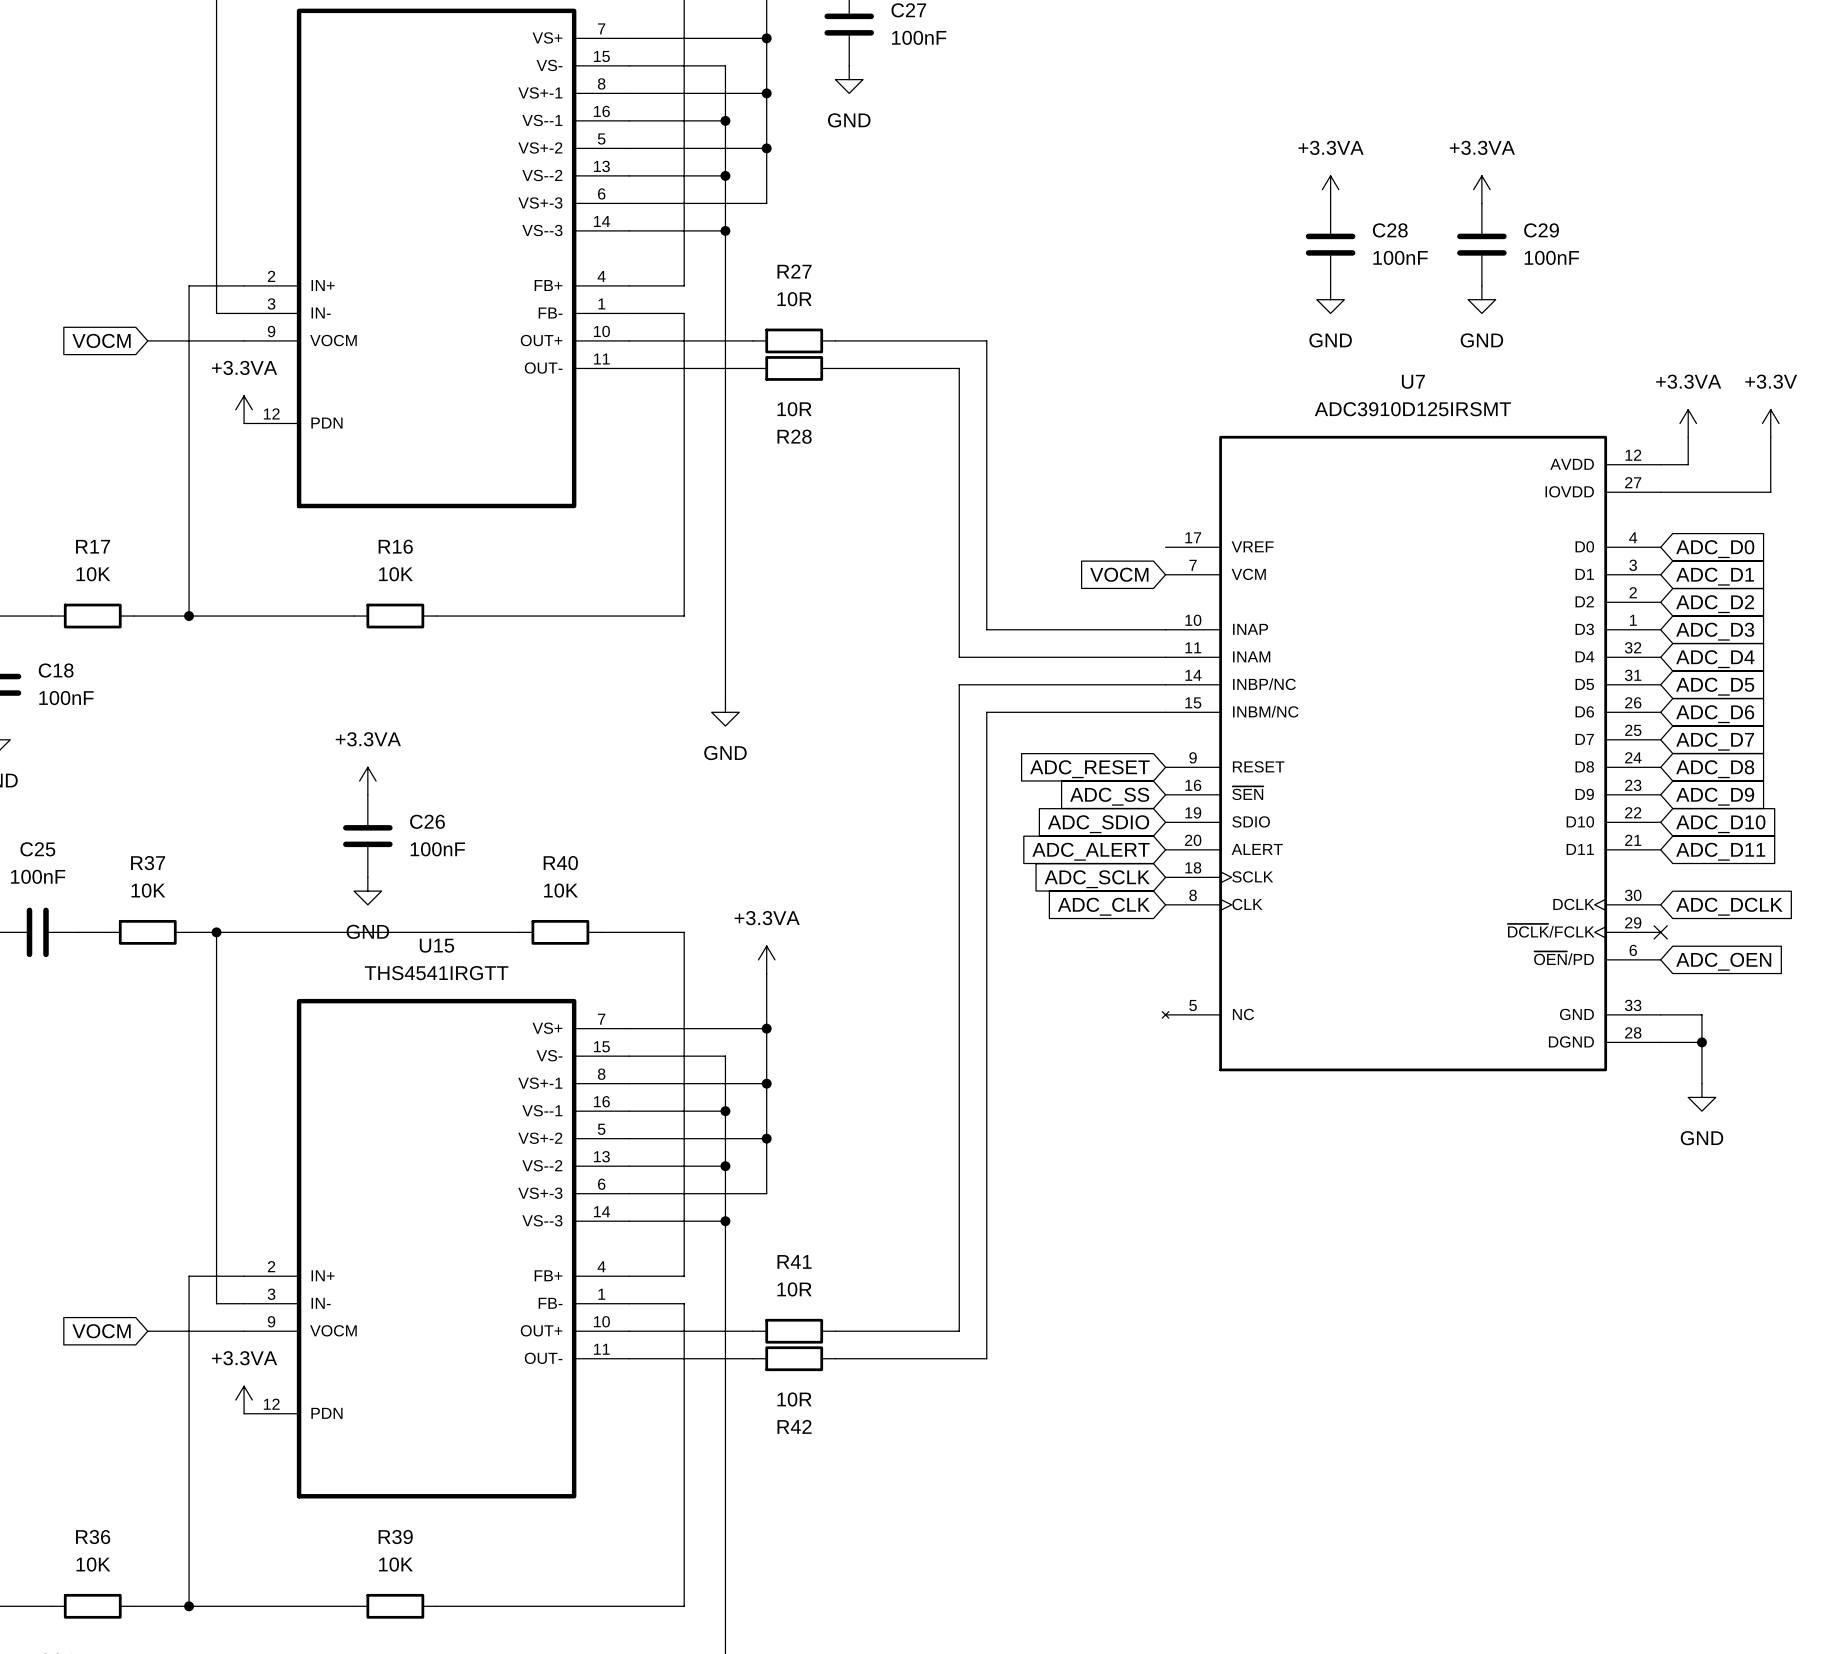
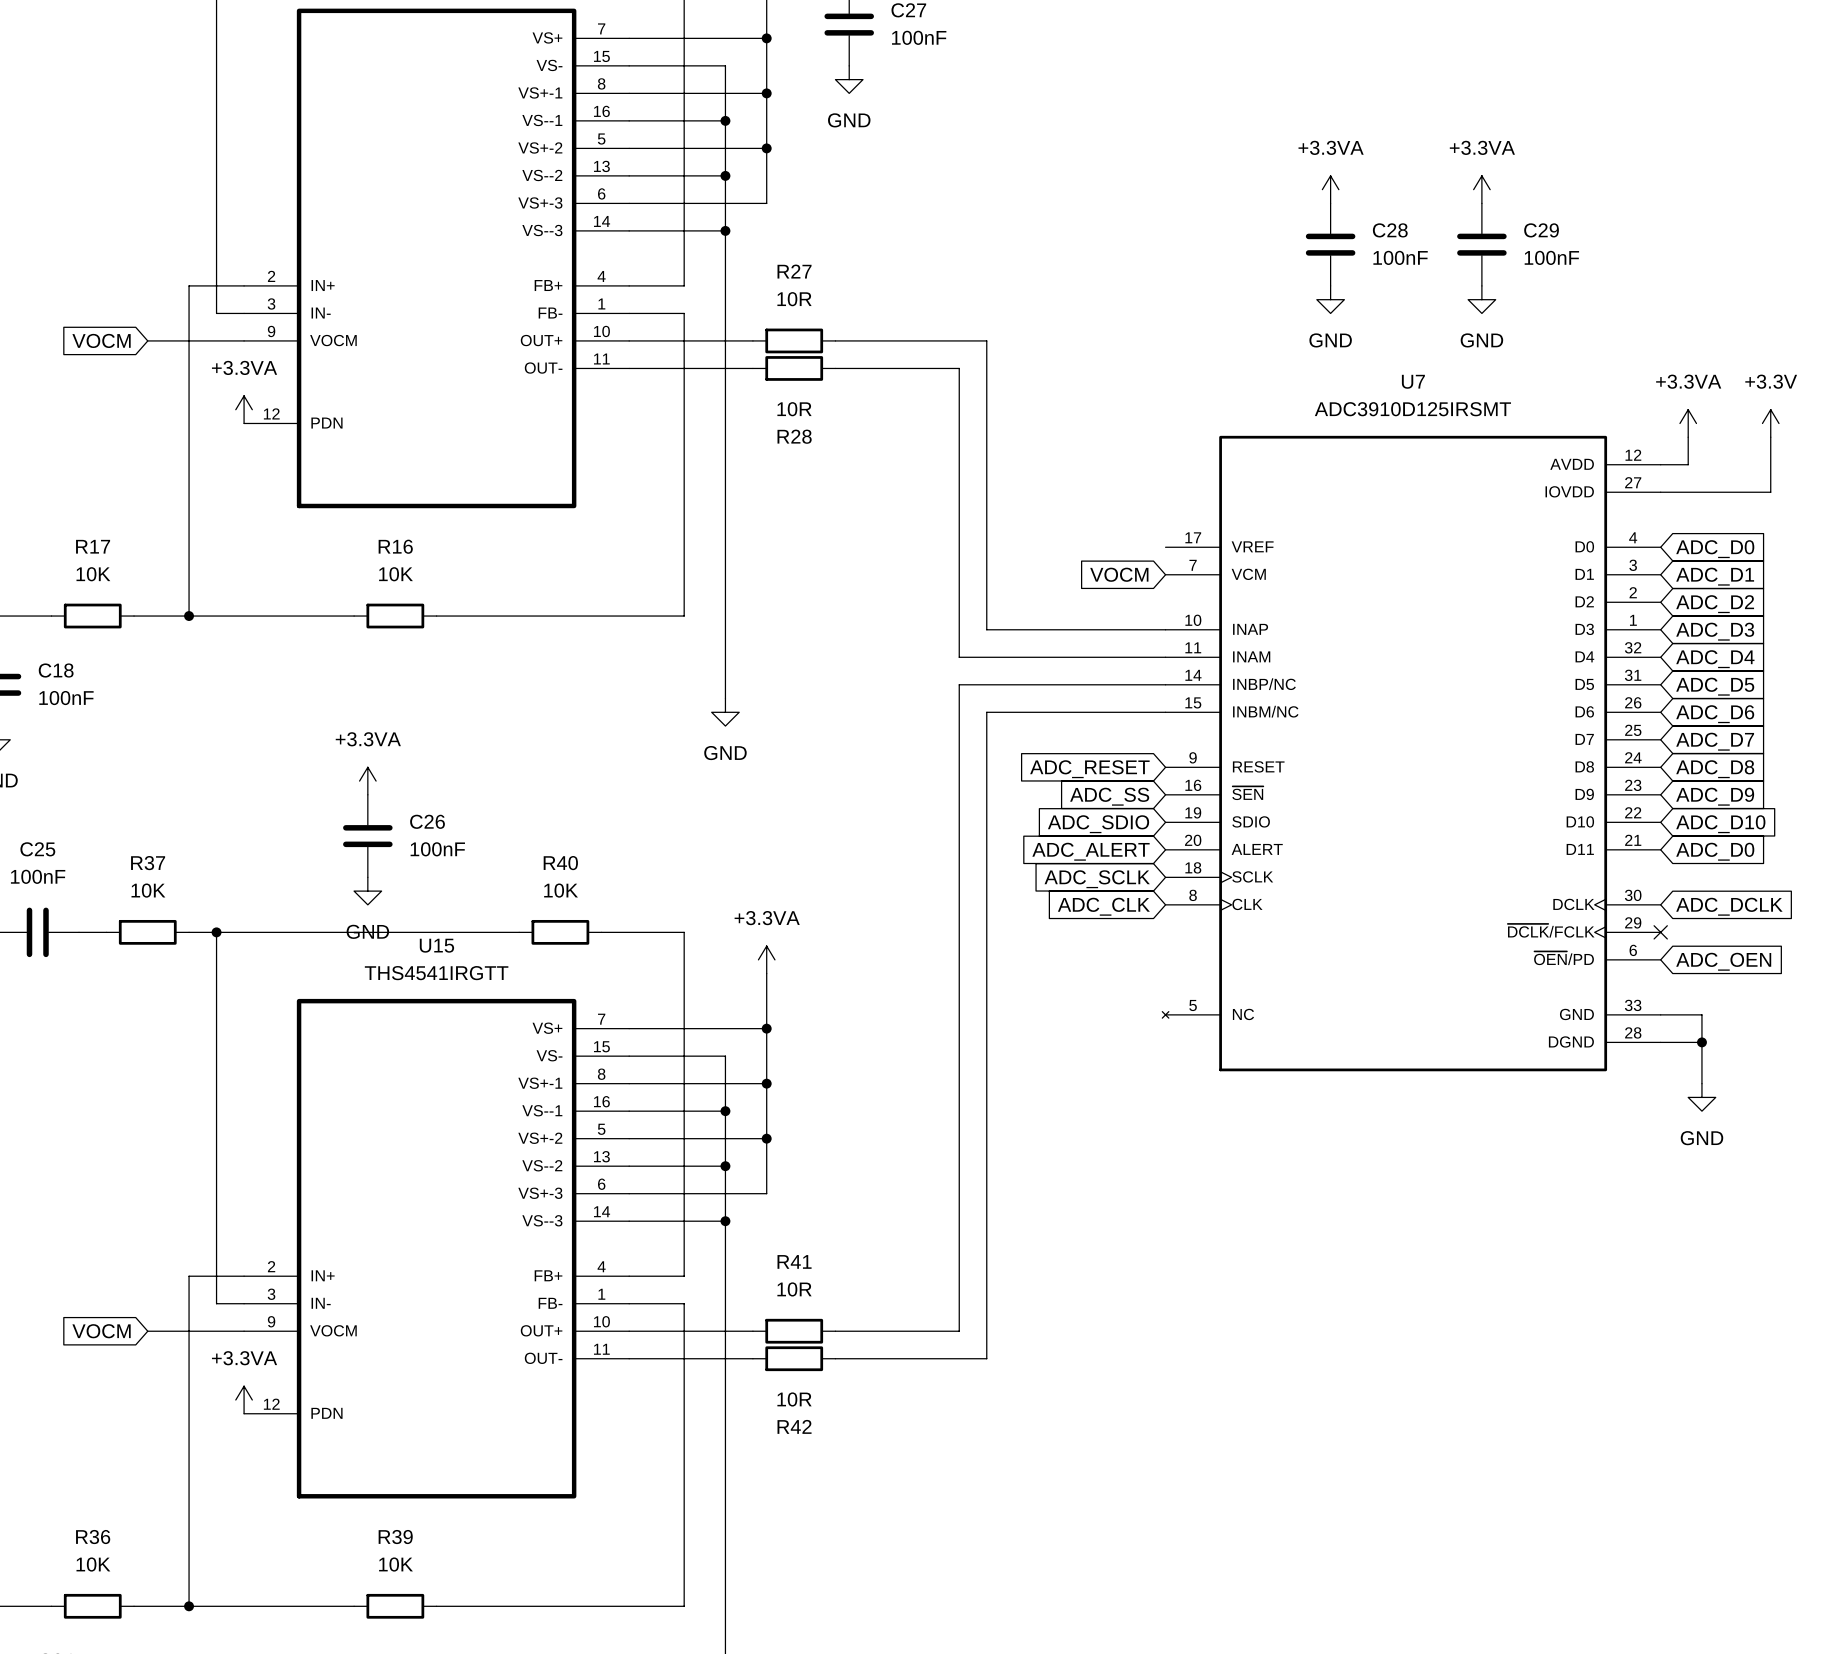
global label: ADC_D11 (1720, 851) -> ADC_D0 (1715, 851)

